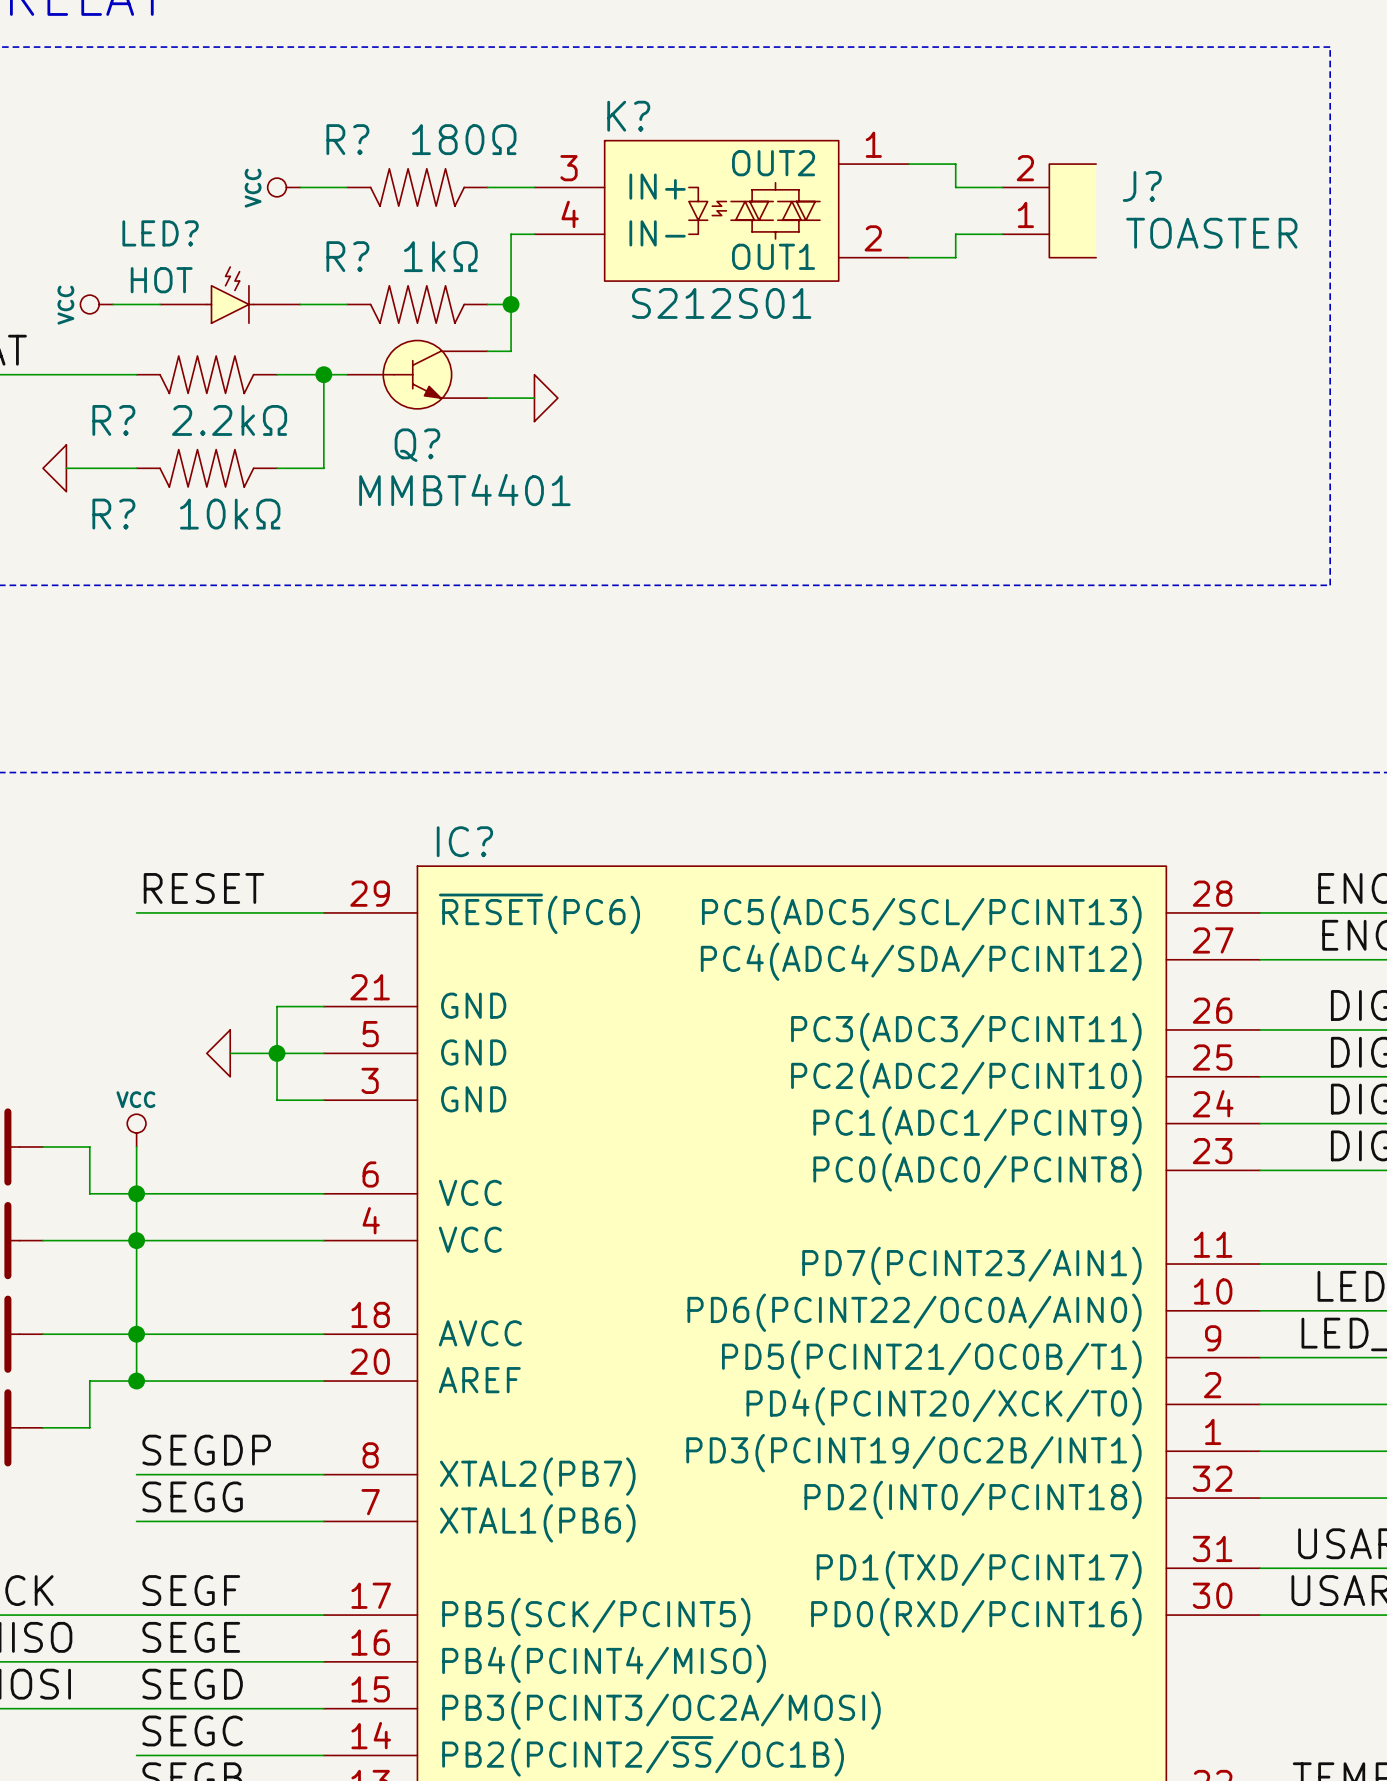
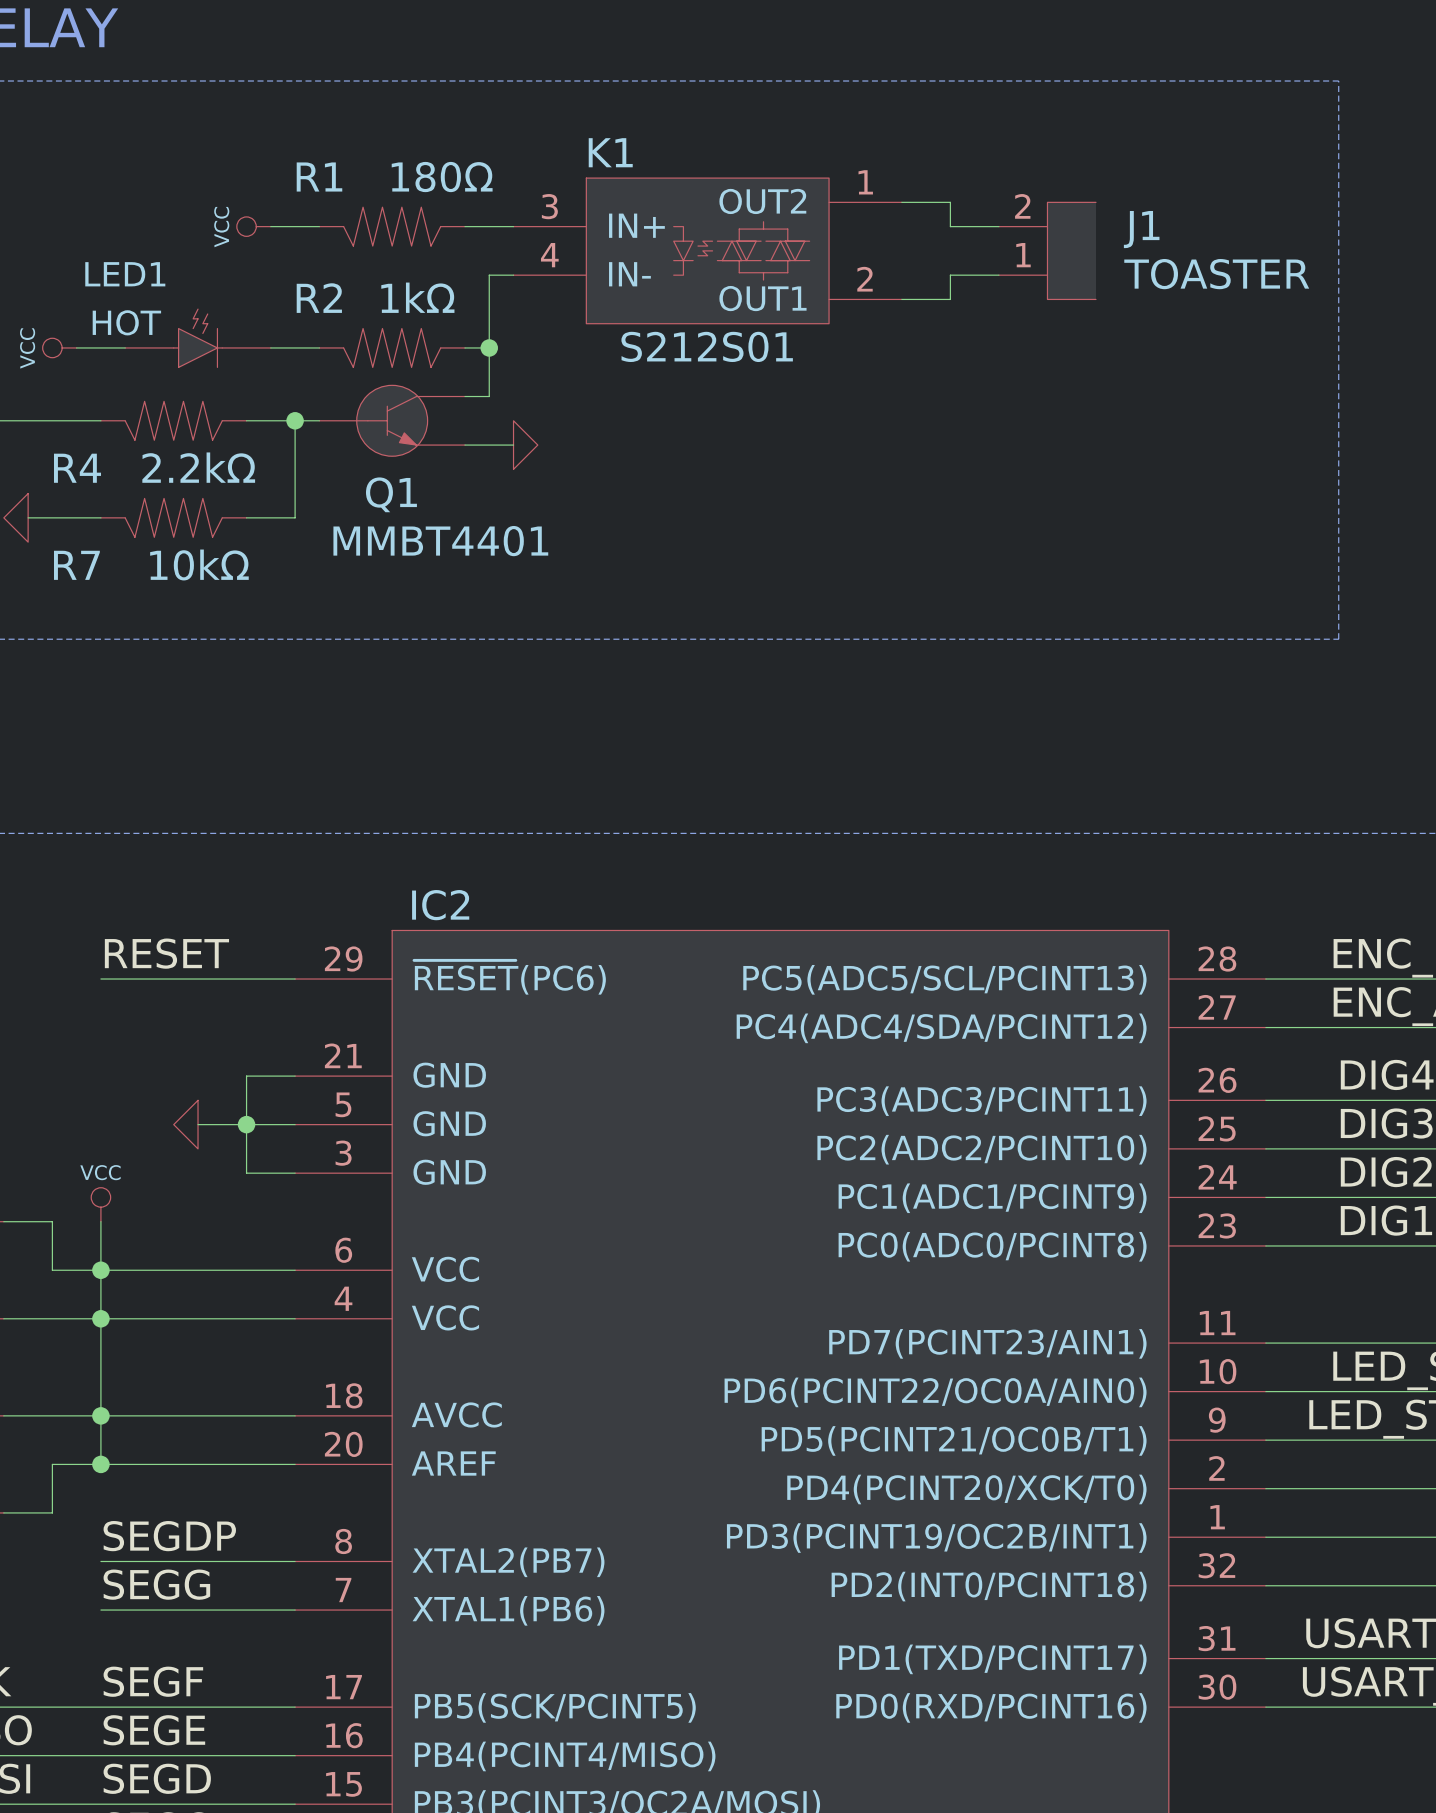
K? name: K? (628, 116) -> K1 (610, 152)
R? name: R? (347, 139) -> R1 (319, 177)
J? name: J? (1142, 186) -> J1 (1141, 229)
LED? name: LED? (160, 233) -> LED1 (125, 274)
R? name: R? (347, 256) -> R2 (319, 298)
R? name: R? (113, 420) -> R4 (77, 468)
Q? name: Q? (417, 445) -> Q1 (391, 494)
R? name: R? (113, 514) -> R7 (76, 565)
IC? name: IC? (464, 841) -> IC2 (440, 905)

